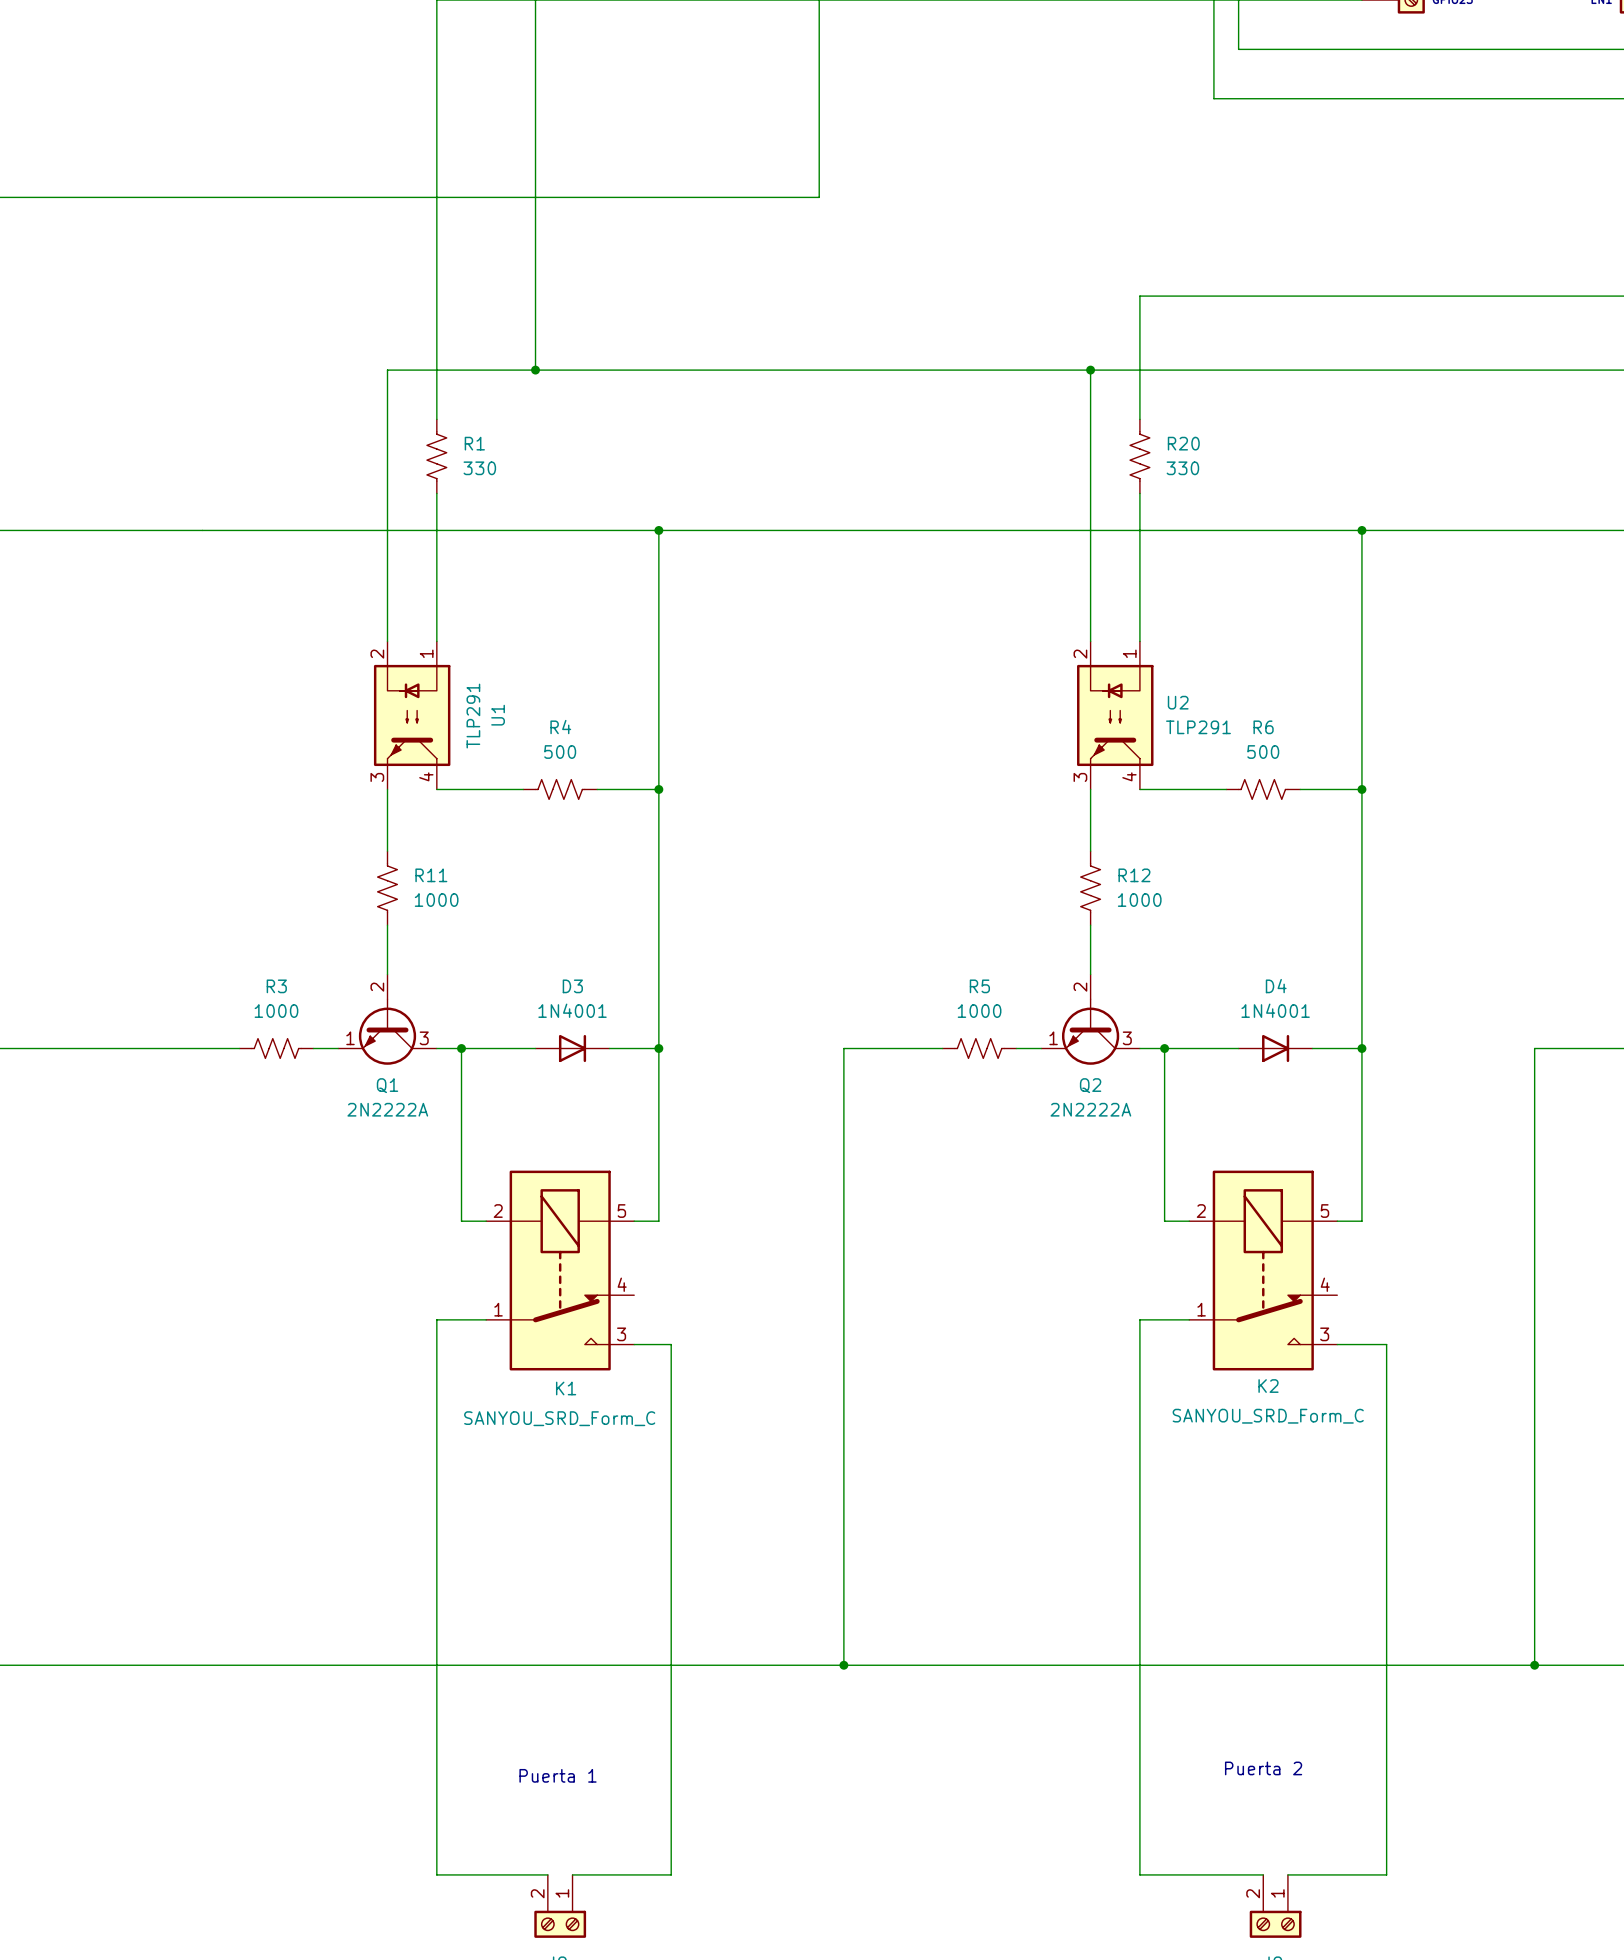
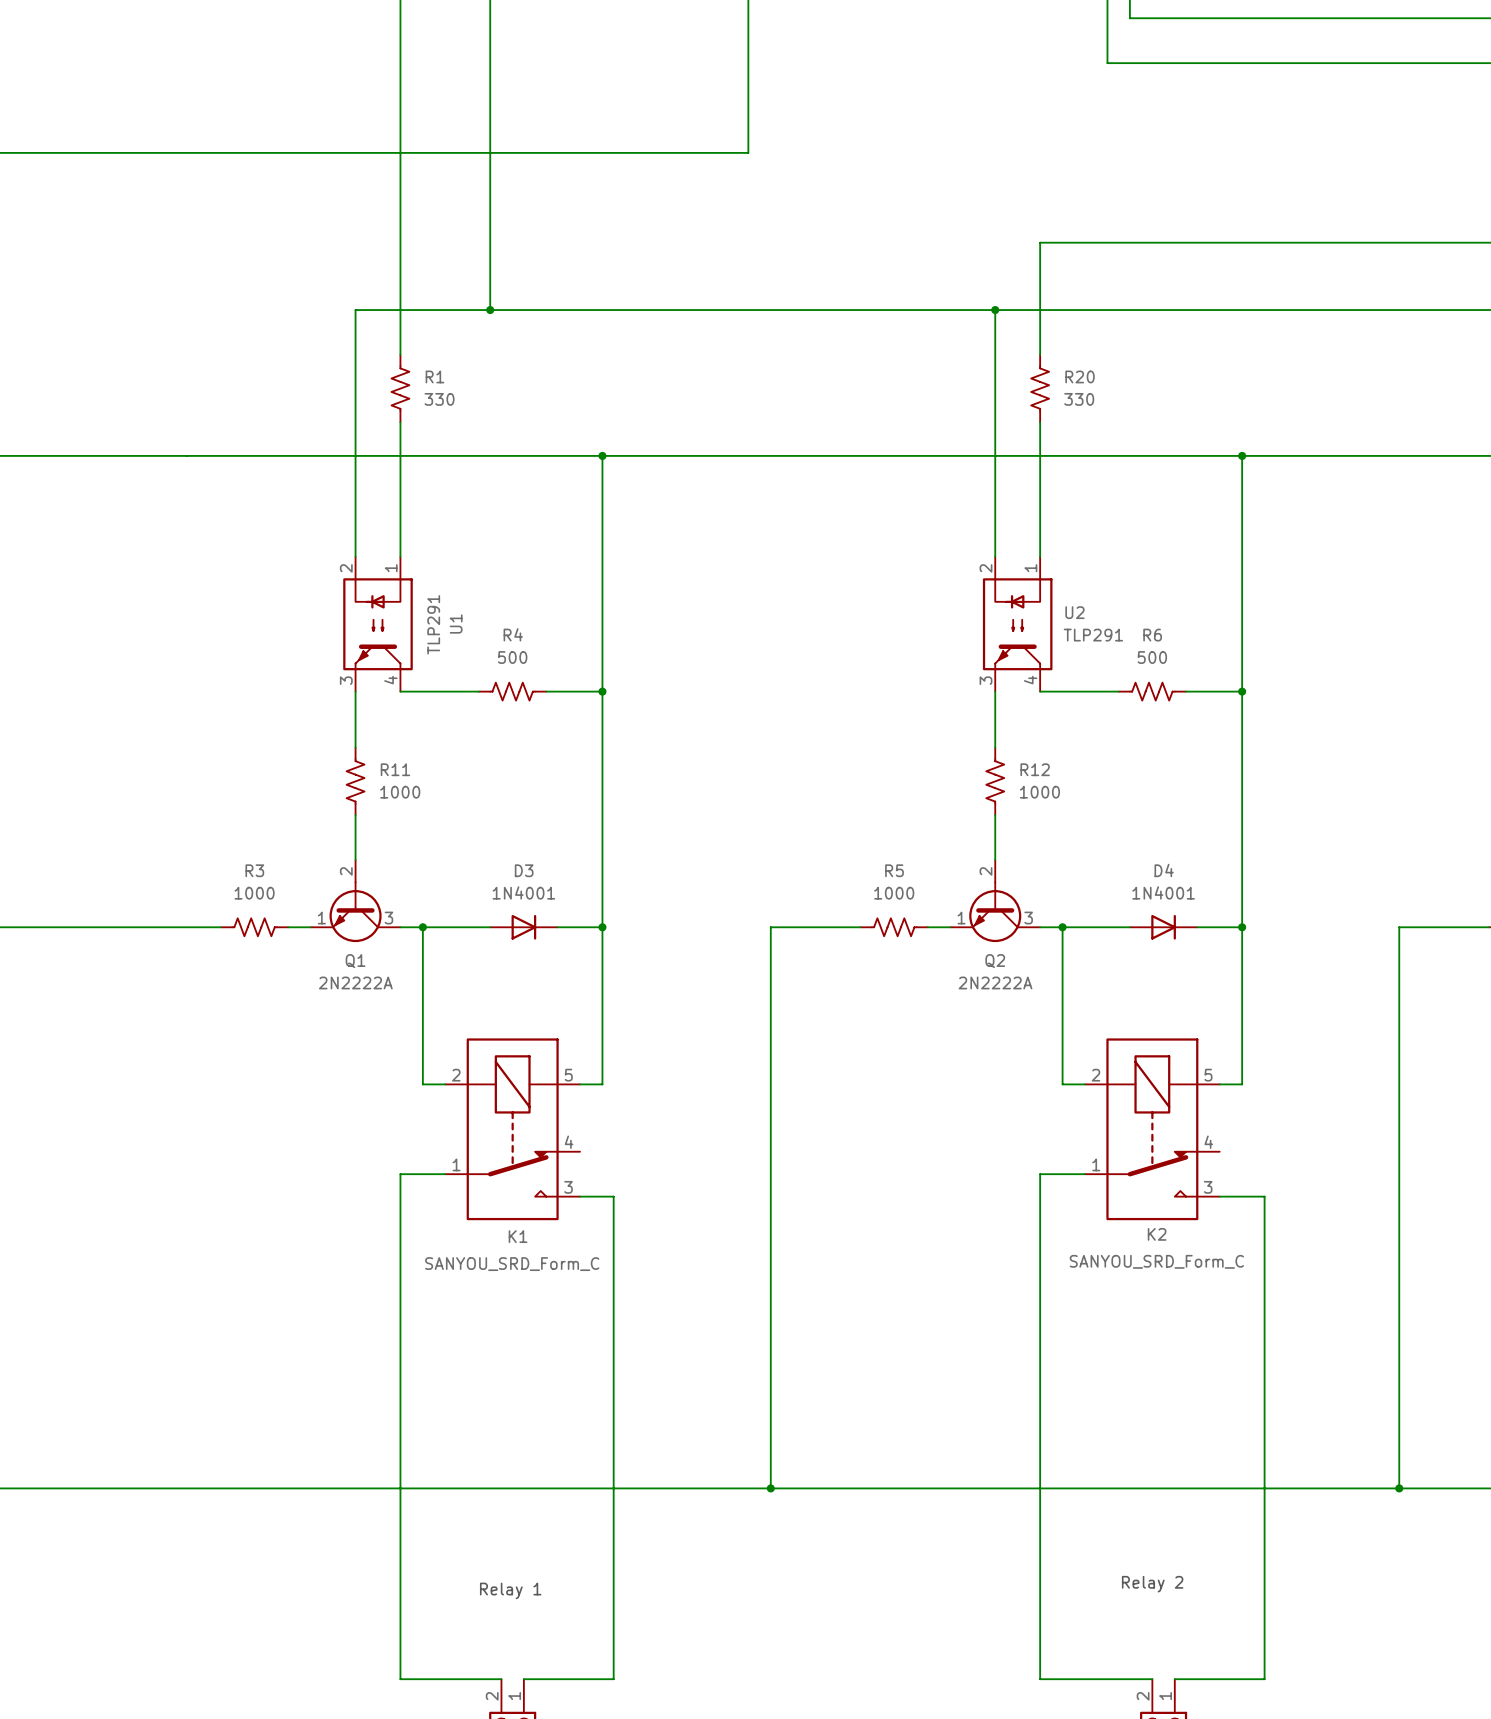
text: Puerta 2 (1263, 1768) -> Relay 2 (1152, 1584)
text: Puerta 1 (558, 1775) -> Relay 1 (510, 1590)

